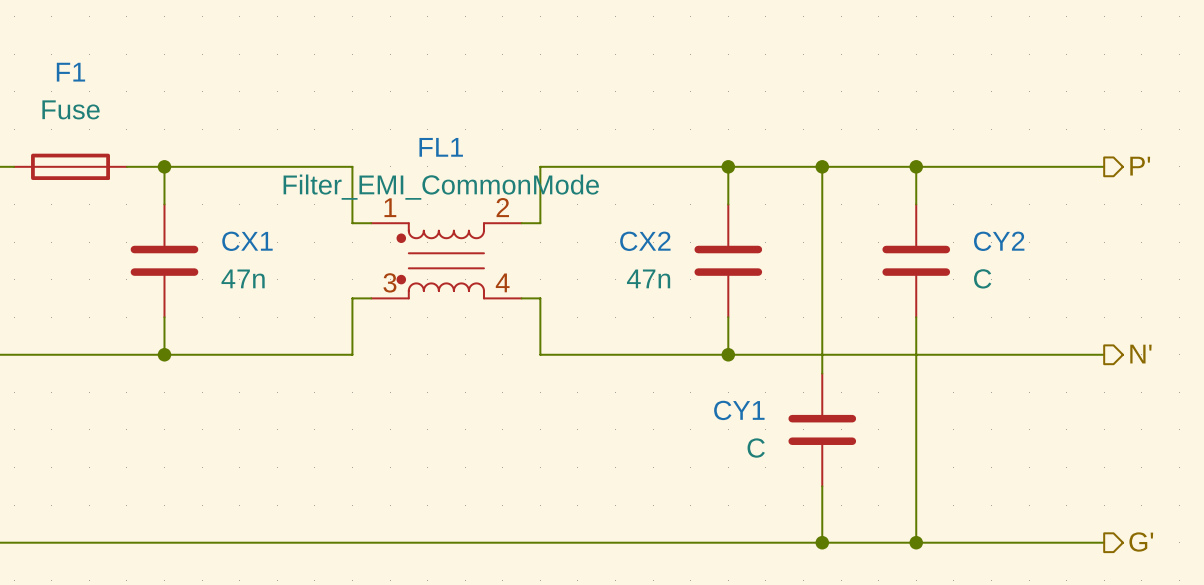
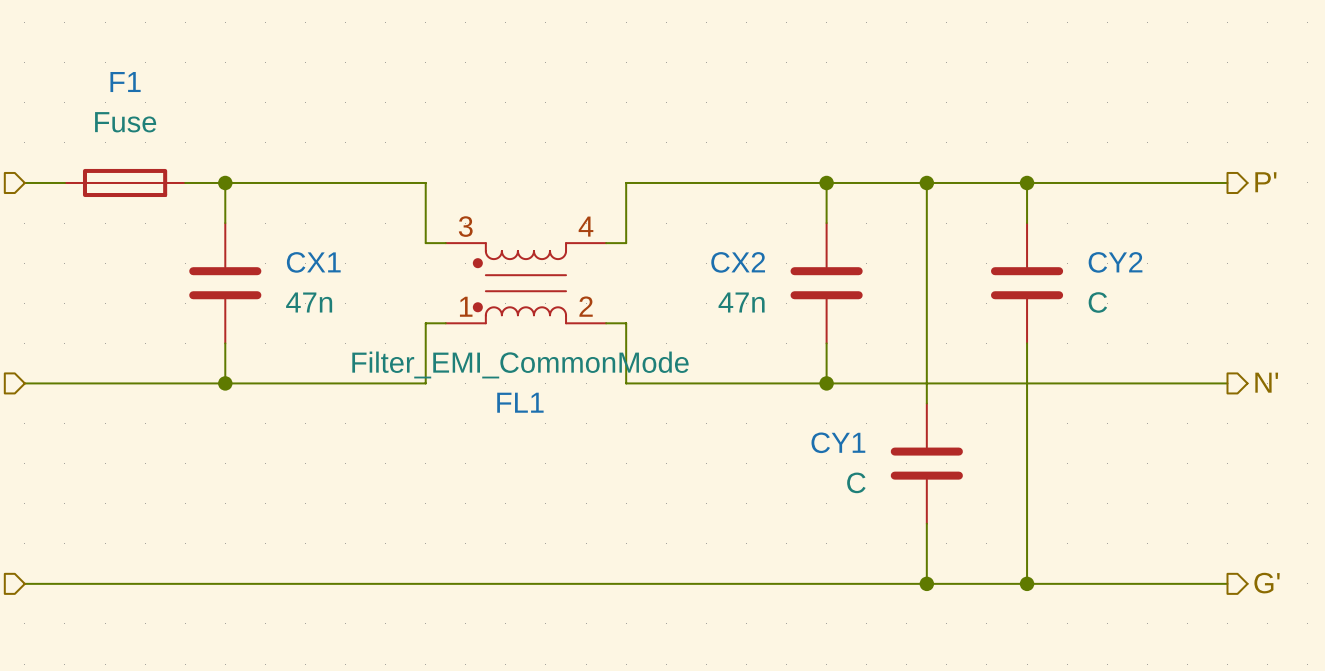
FL1 flip: as is (440, 260) -> up-down (519, 283)

